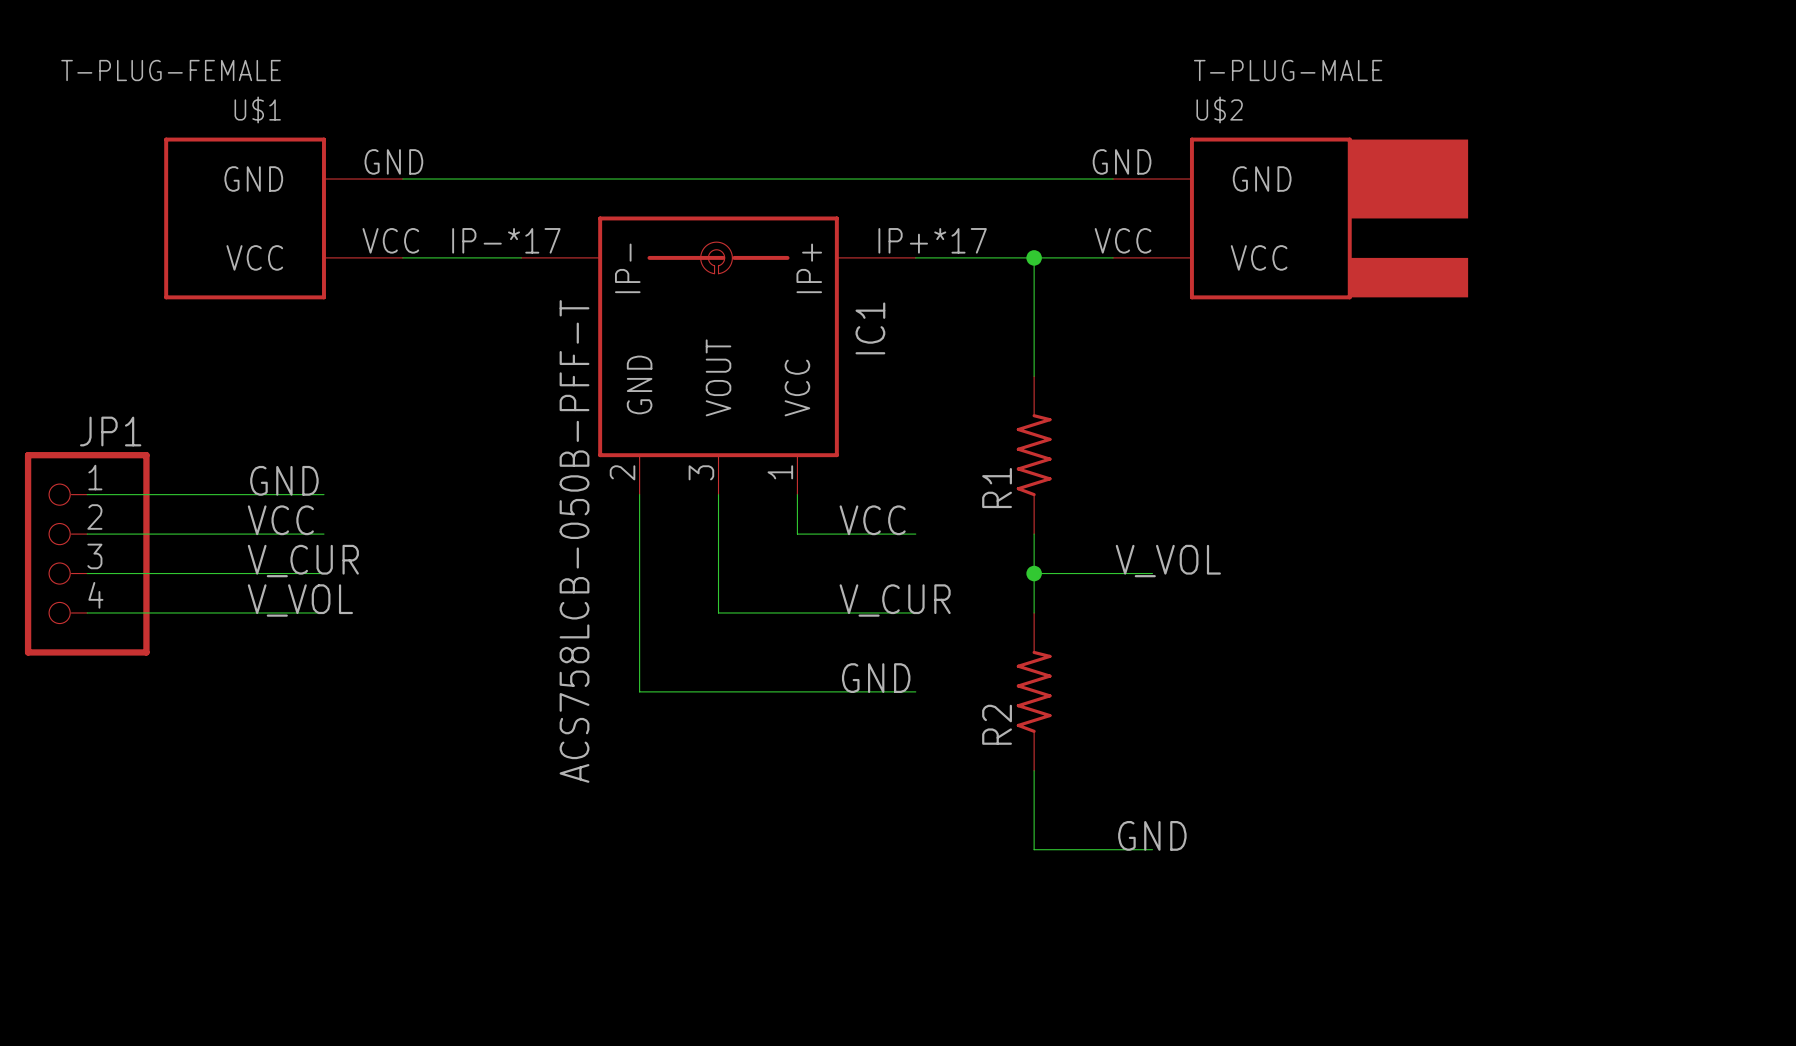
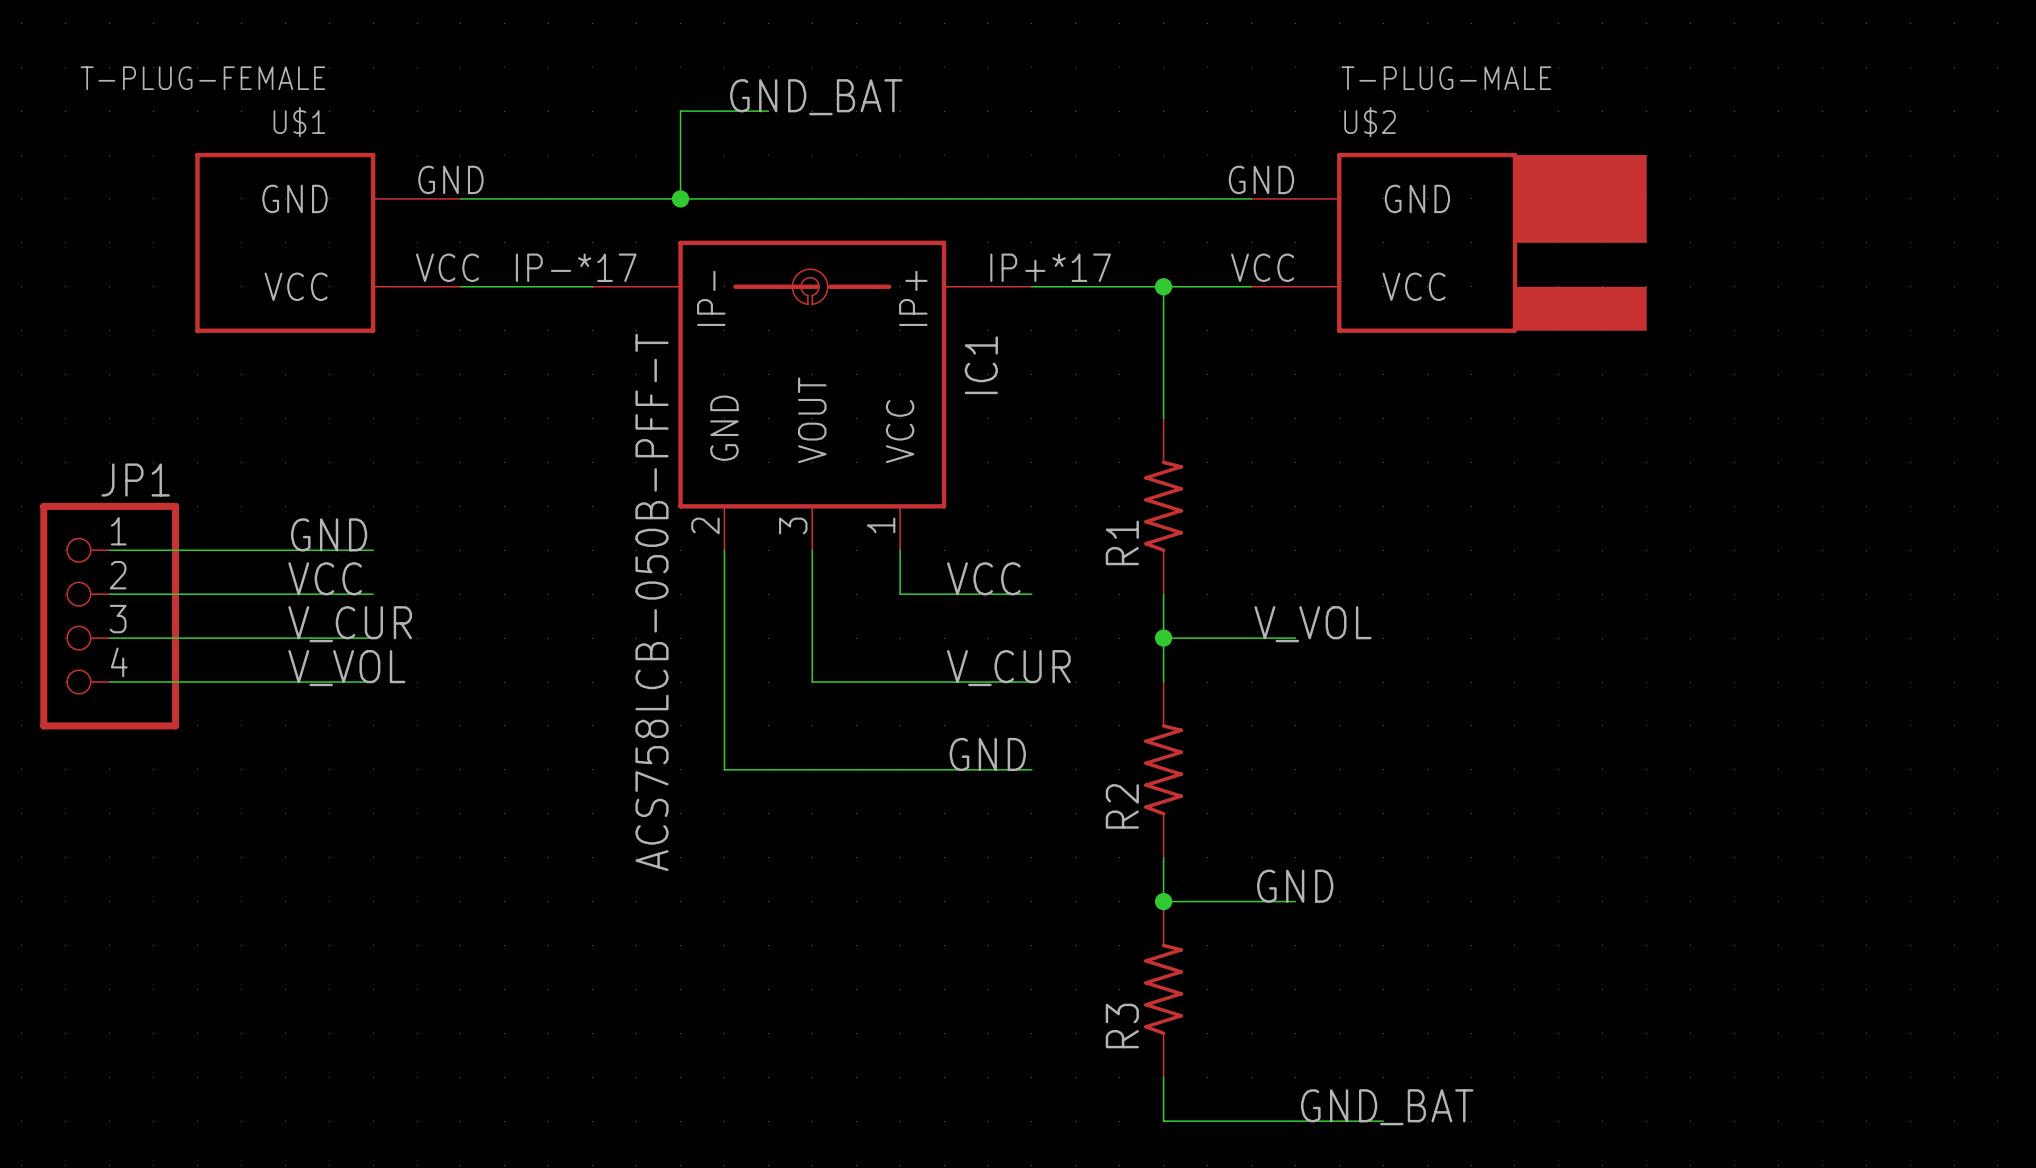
label: none -> GND_BAT (816, 97)
wire: none -> (768, 111) (680, 111) (680, 198)
junction: none -> (680, 198)
wire: (1034, 810) (1034, 849) (1152, 849) -> (1163, 901) (1295, 901)
junction: none -> (1163, 901)
label position: GND (1152, 835) -> GND (1295, 886)
R3: none -> (1163, 989)
wire: none -> (1163, 1077) (1163, 1121) (1383, 1121)
label: none -> GND_BAT (1387, 1107)

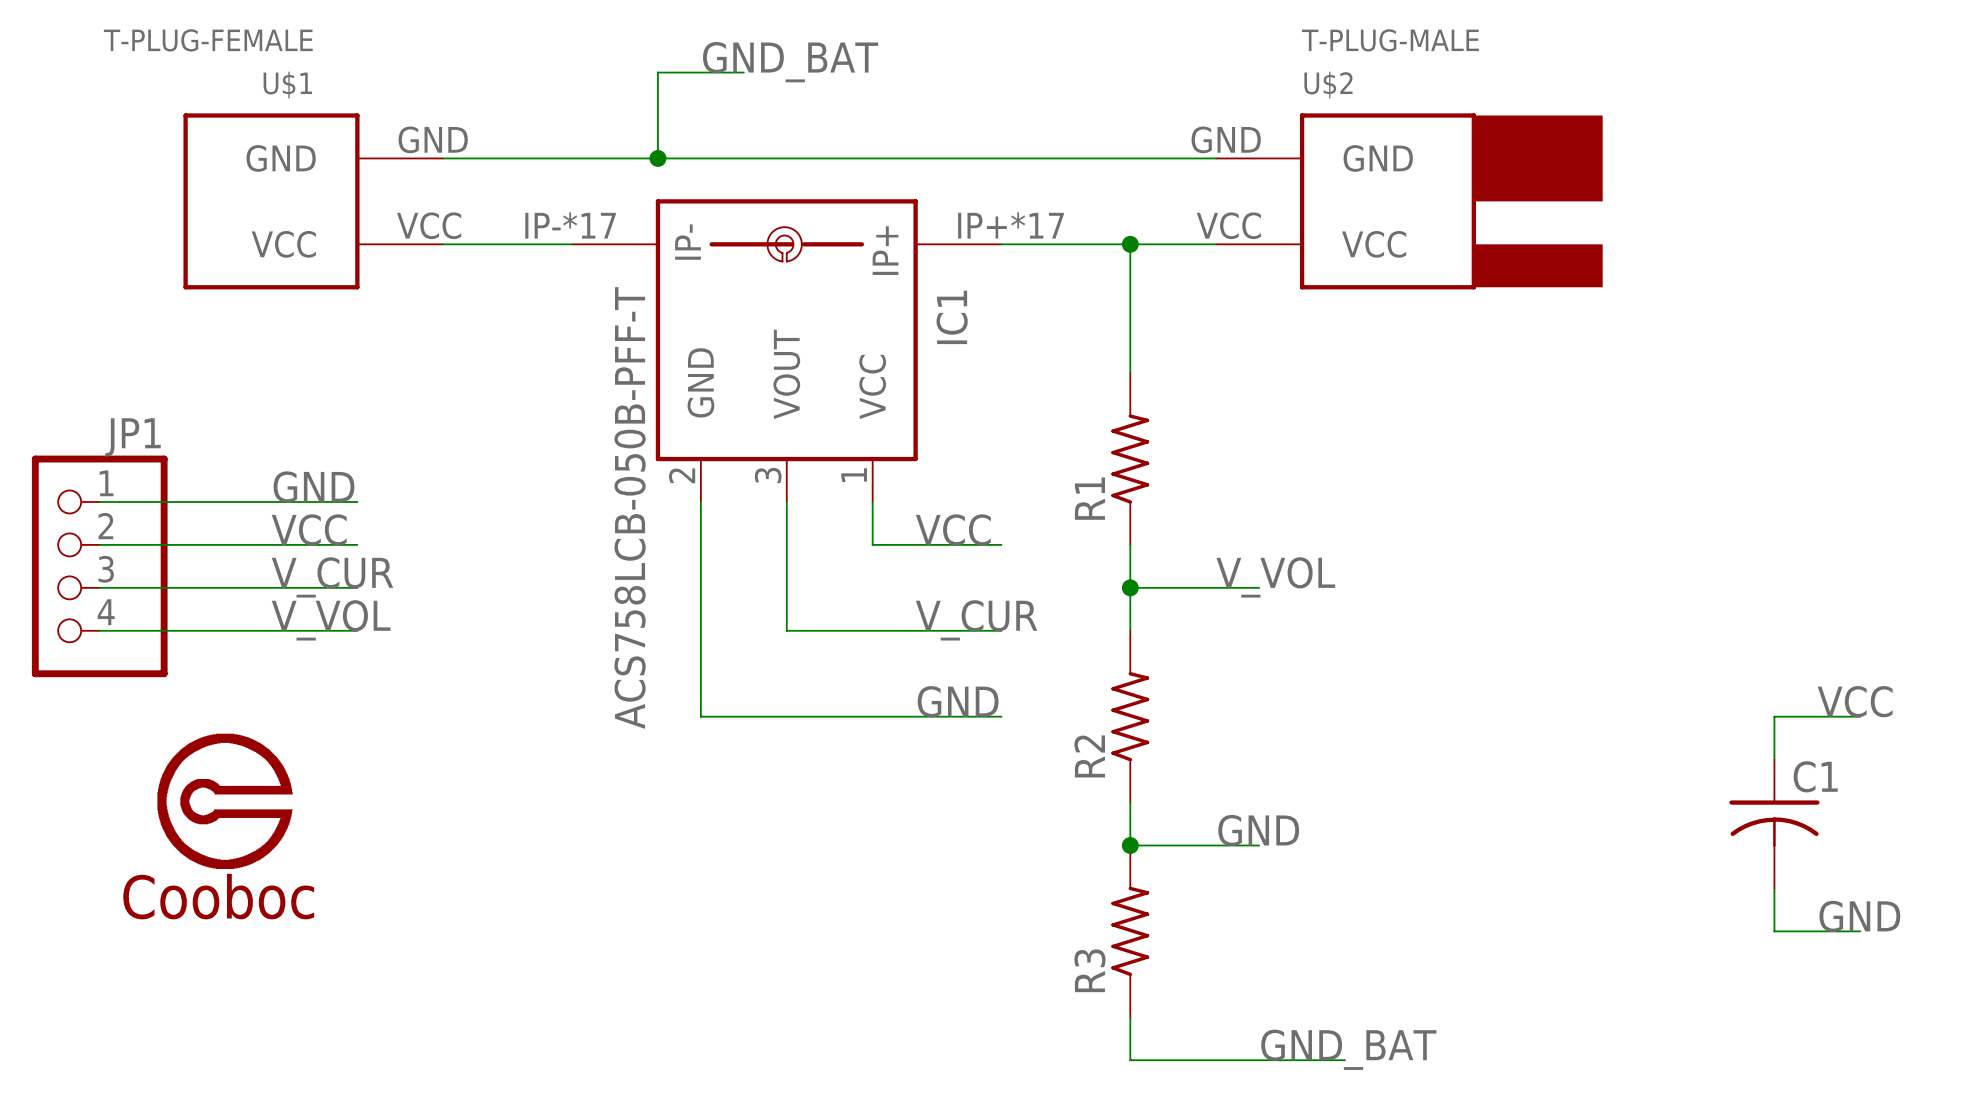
label: none -> VCC (1855, 701)
wire: none -> (1860, 716) (1774, 716) (1774, 759)
part: none -> (225, 801)
C1: none -> (1774, 824)
wire: none -> (1774, 888) (1774, 931) (1860, 931)
label: none -> GND (1859, 916)

